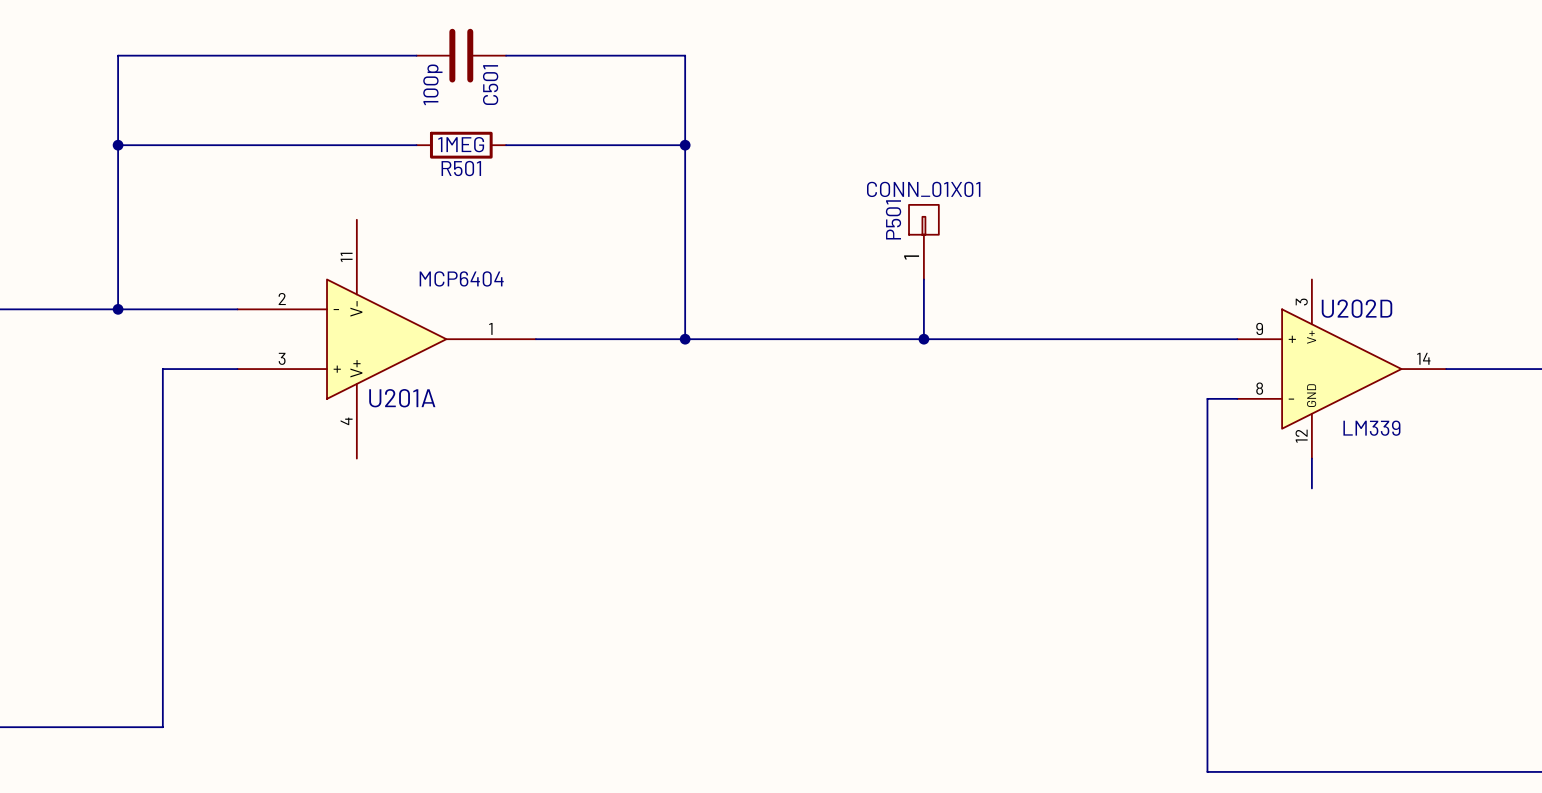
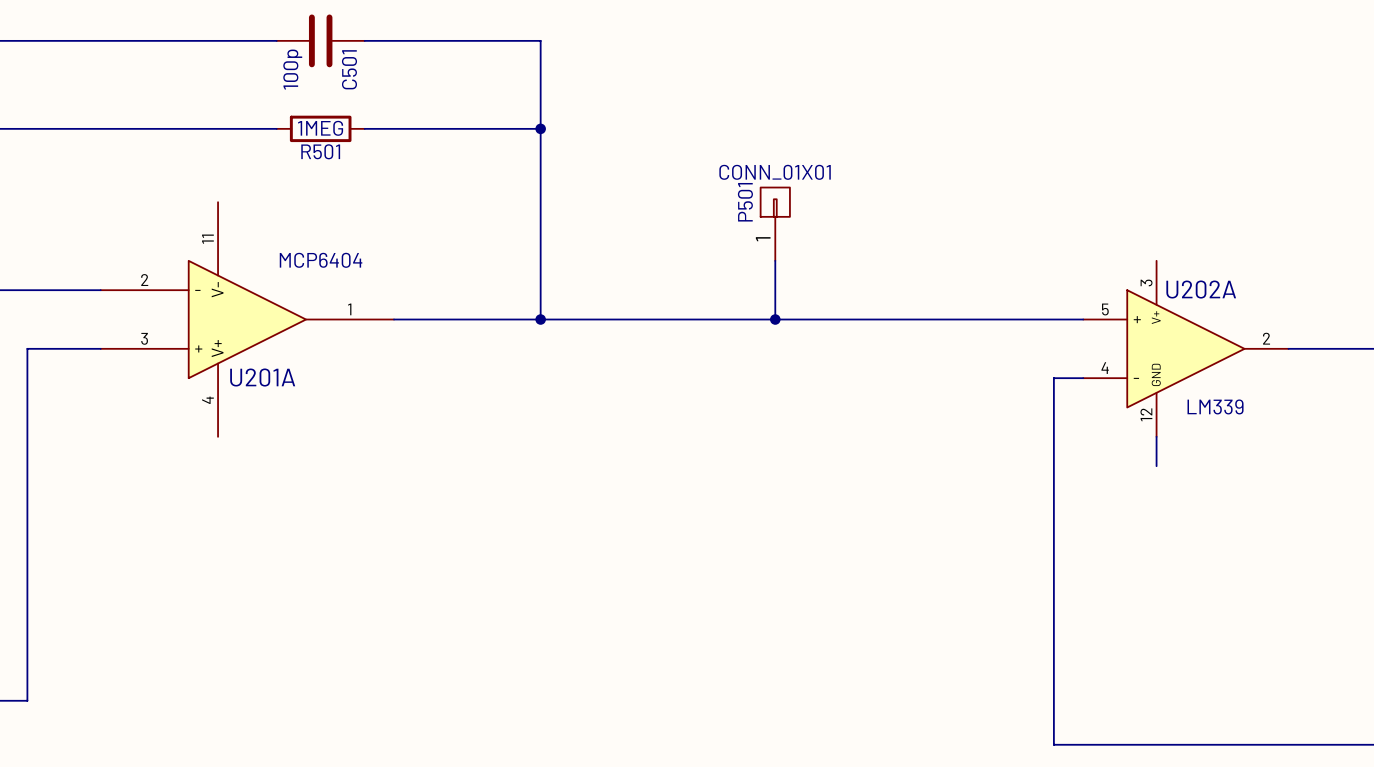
U202D name: U202D (1357, 308) -> U202A (1201, 289)
U202D pin number: 9 (1259, 328) -> 5 (1105, 309)
U202D pin number: 14 (1423, 358) -> 2 (1266, 338)
U202D pin number: 8 (1259, 388) -> 4 (1105, 368)

